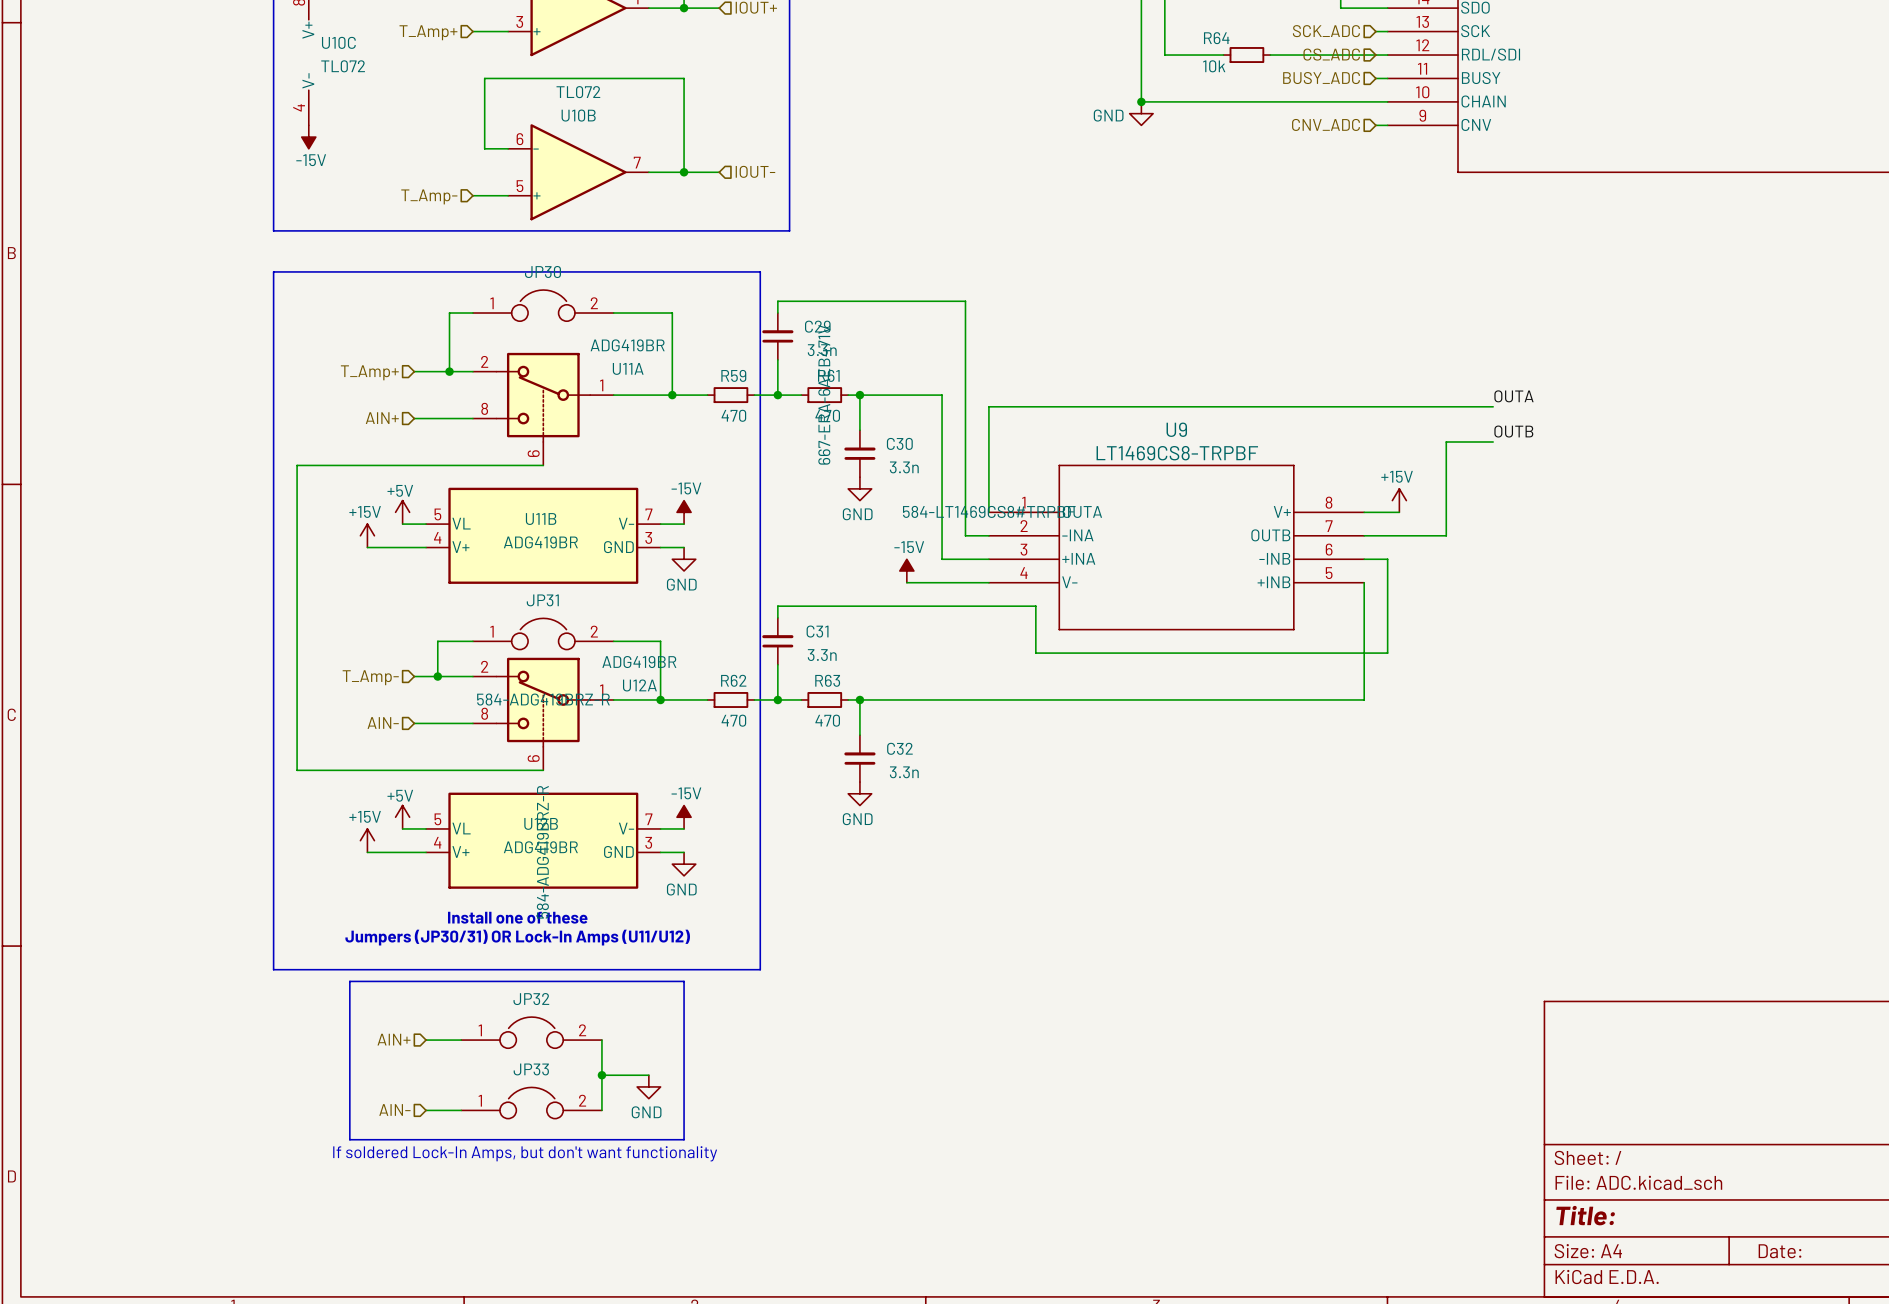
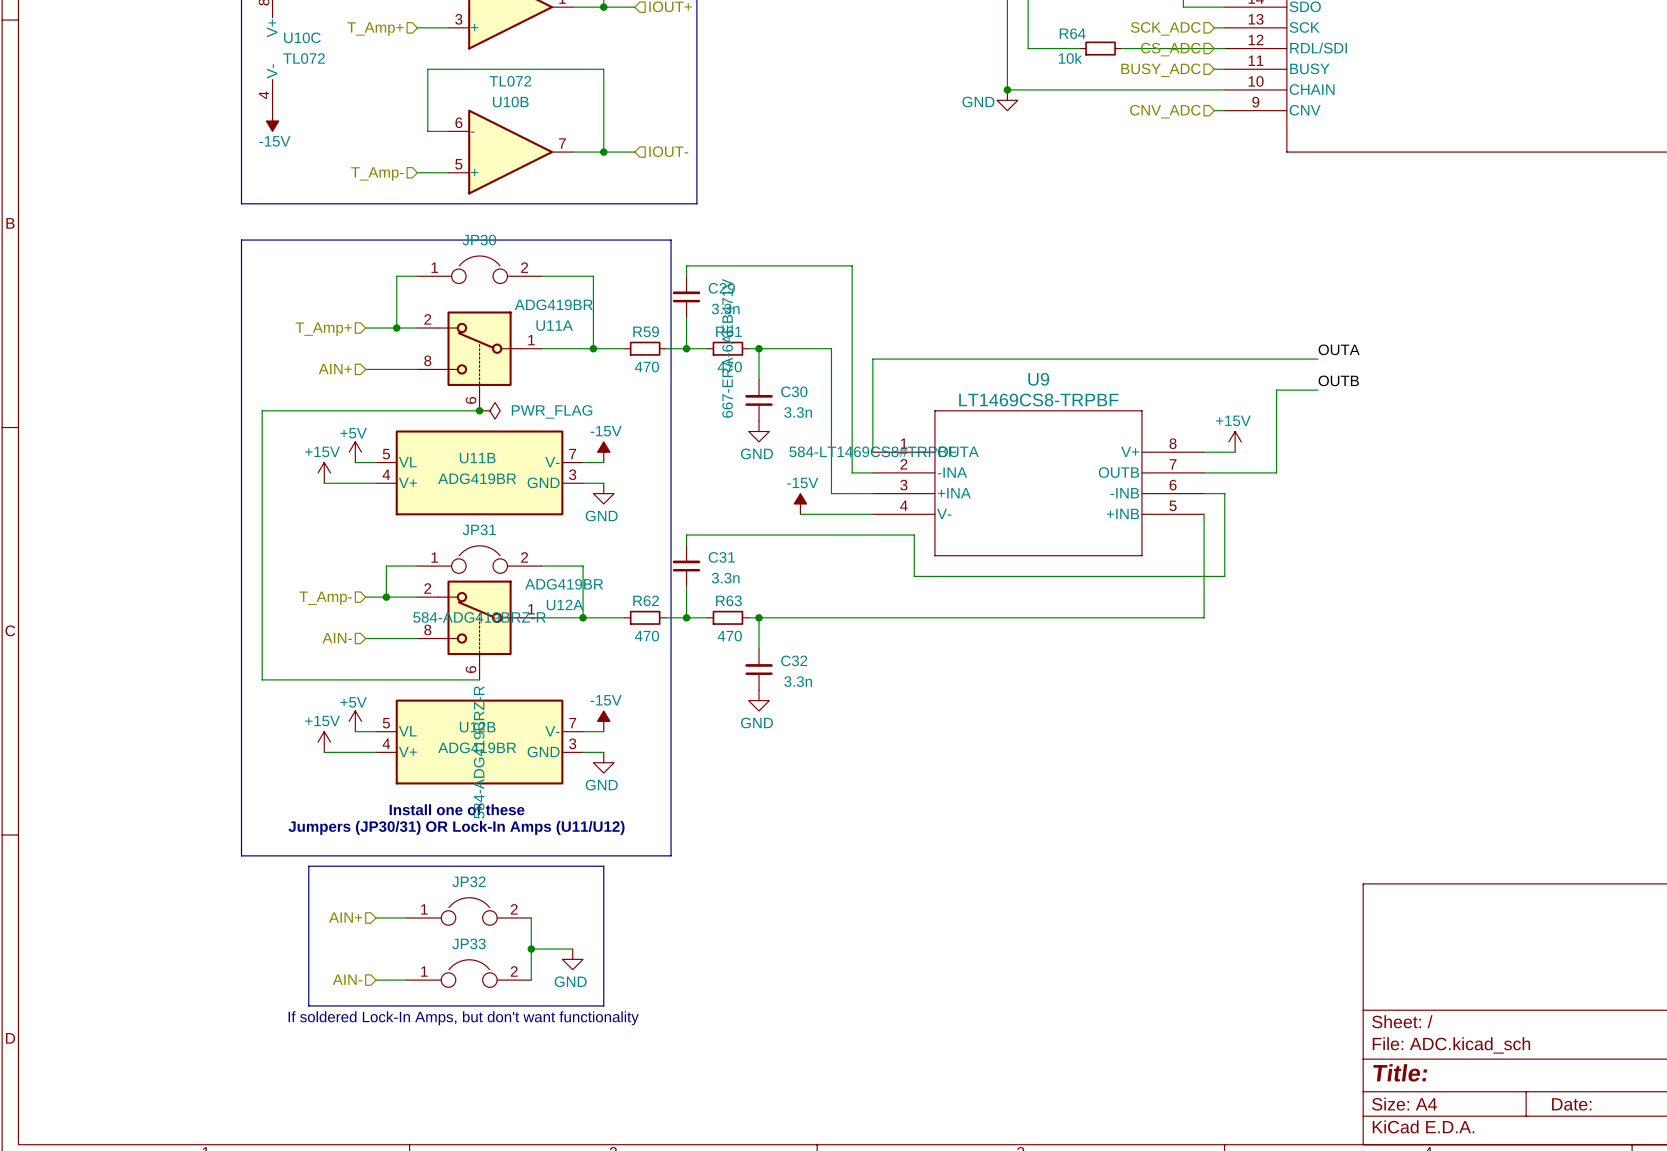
junction: none -> (479, 410)
power symbol: none -> PWR_FLAG (489, 410)

